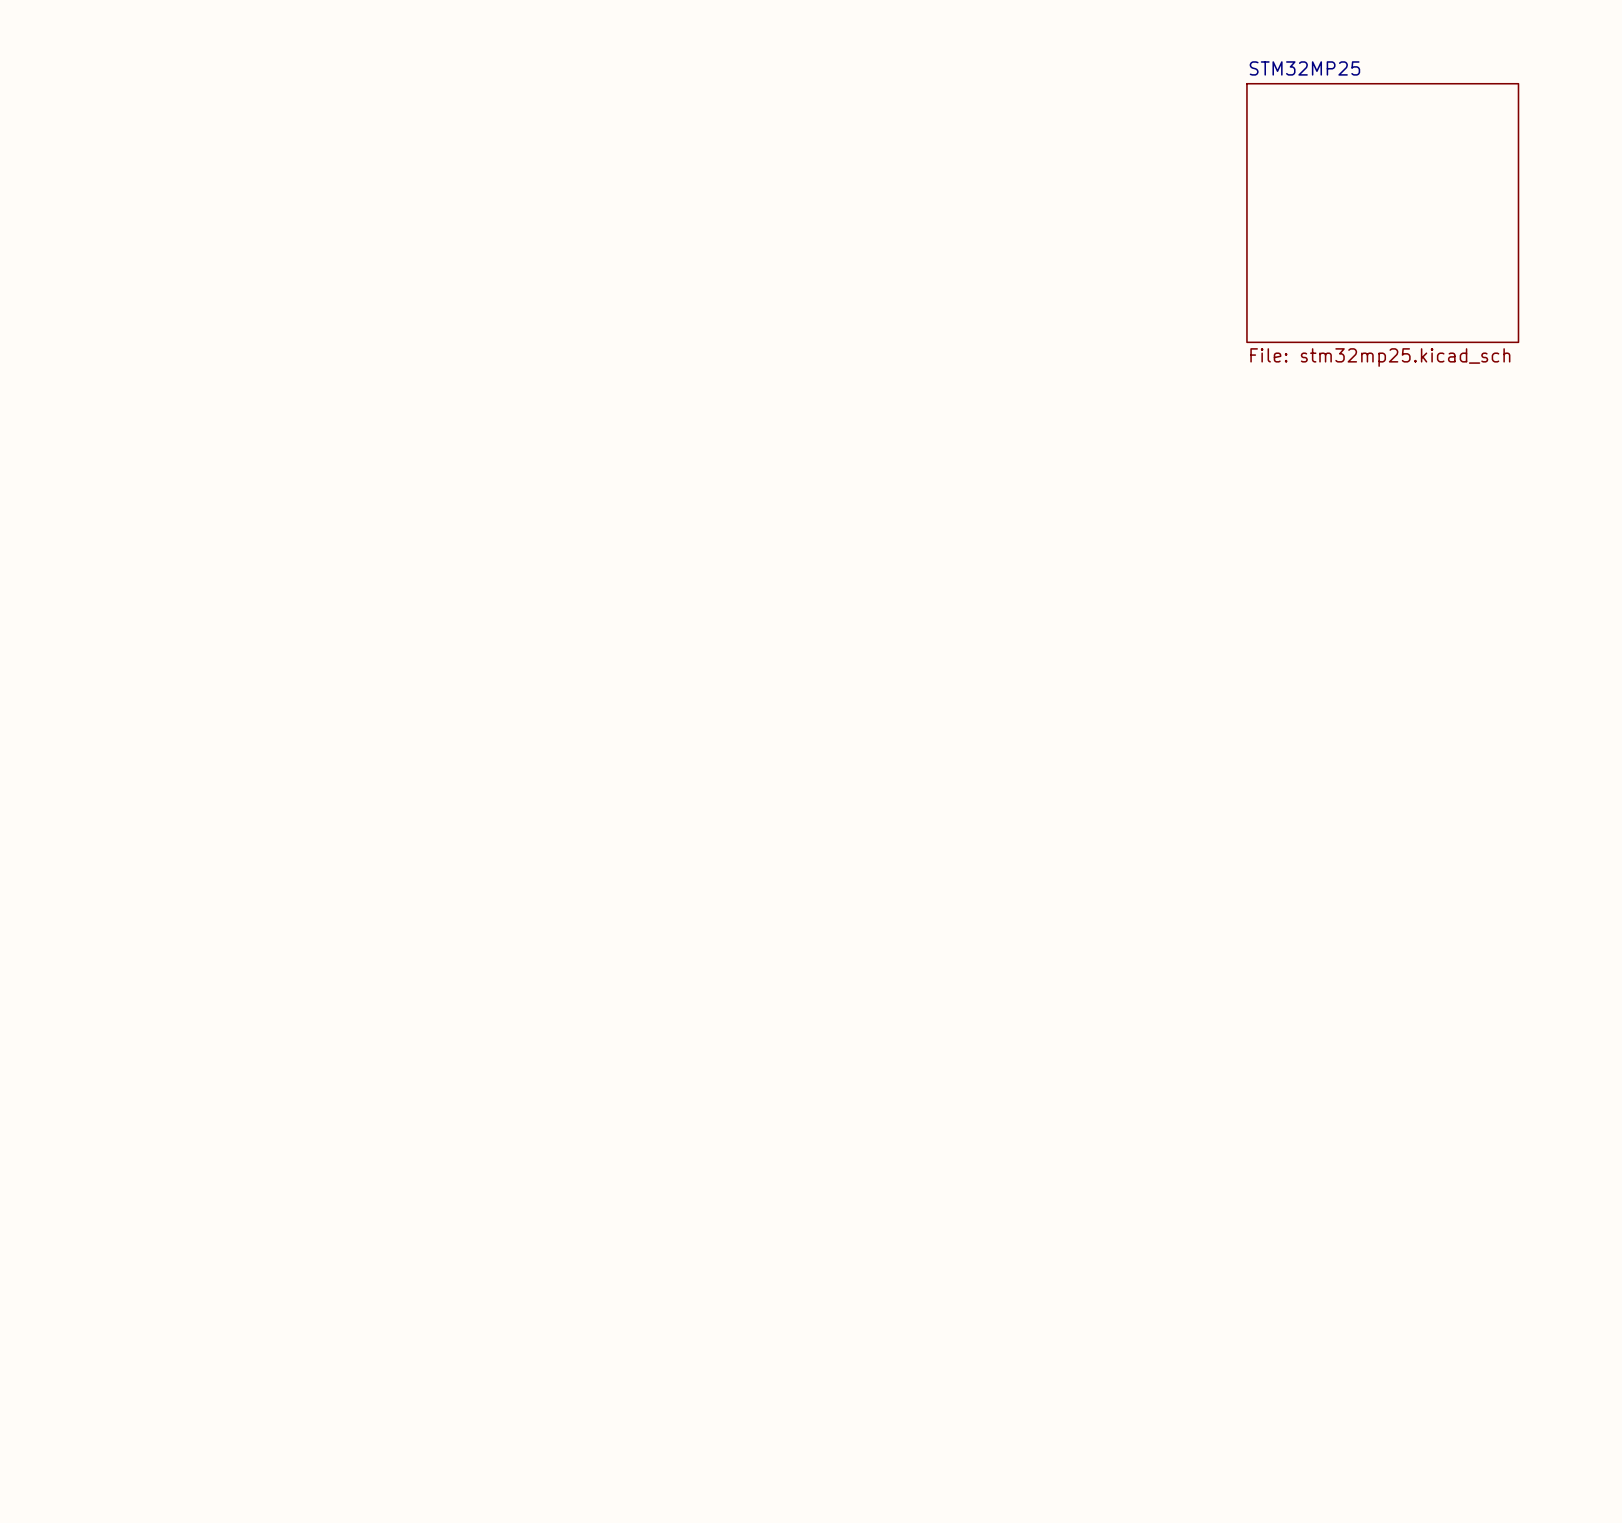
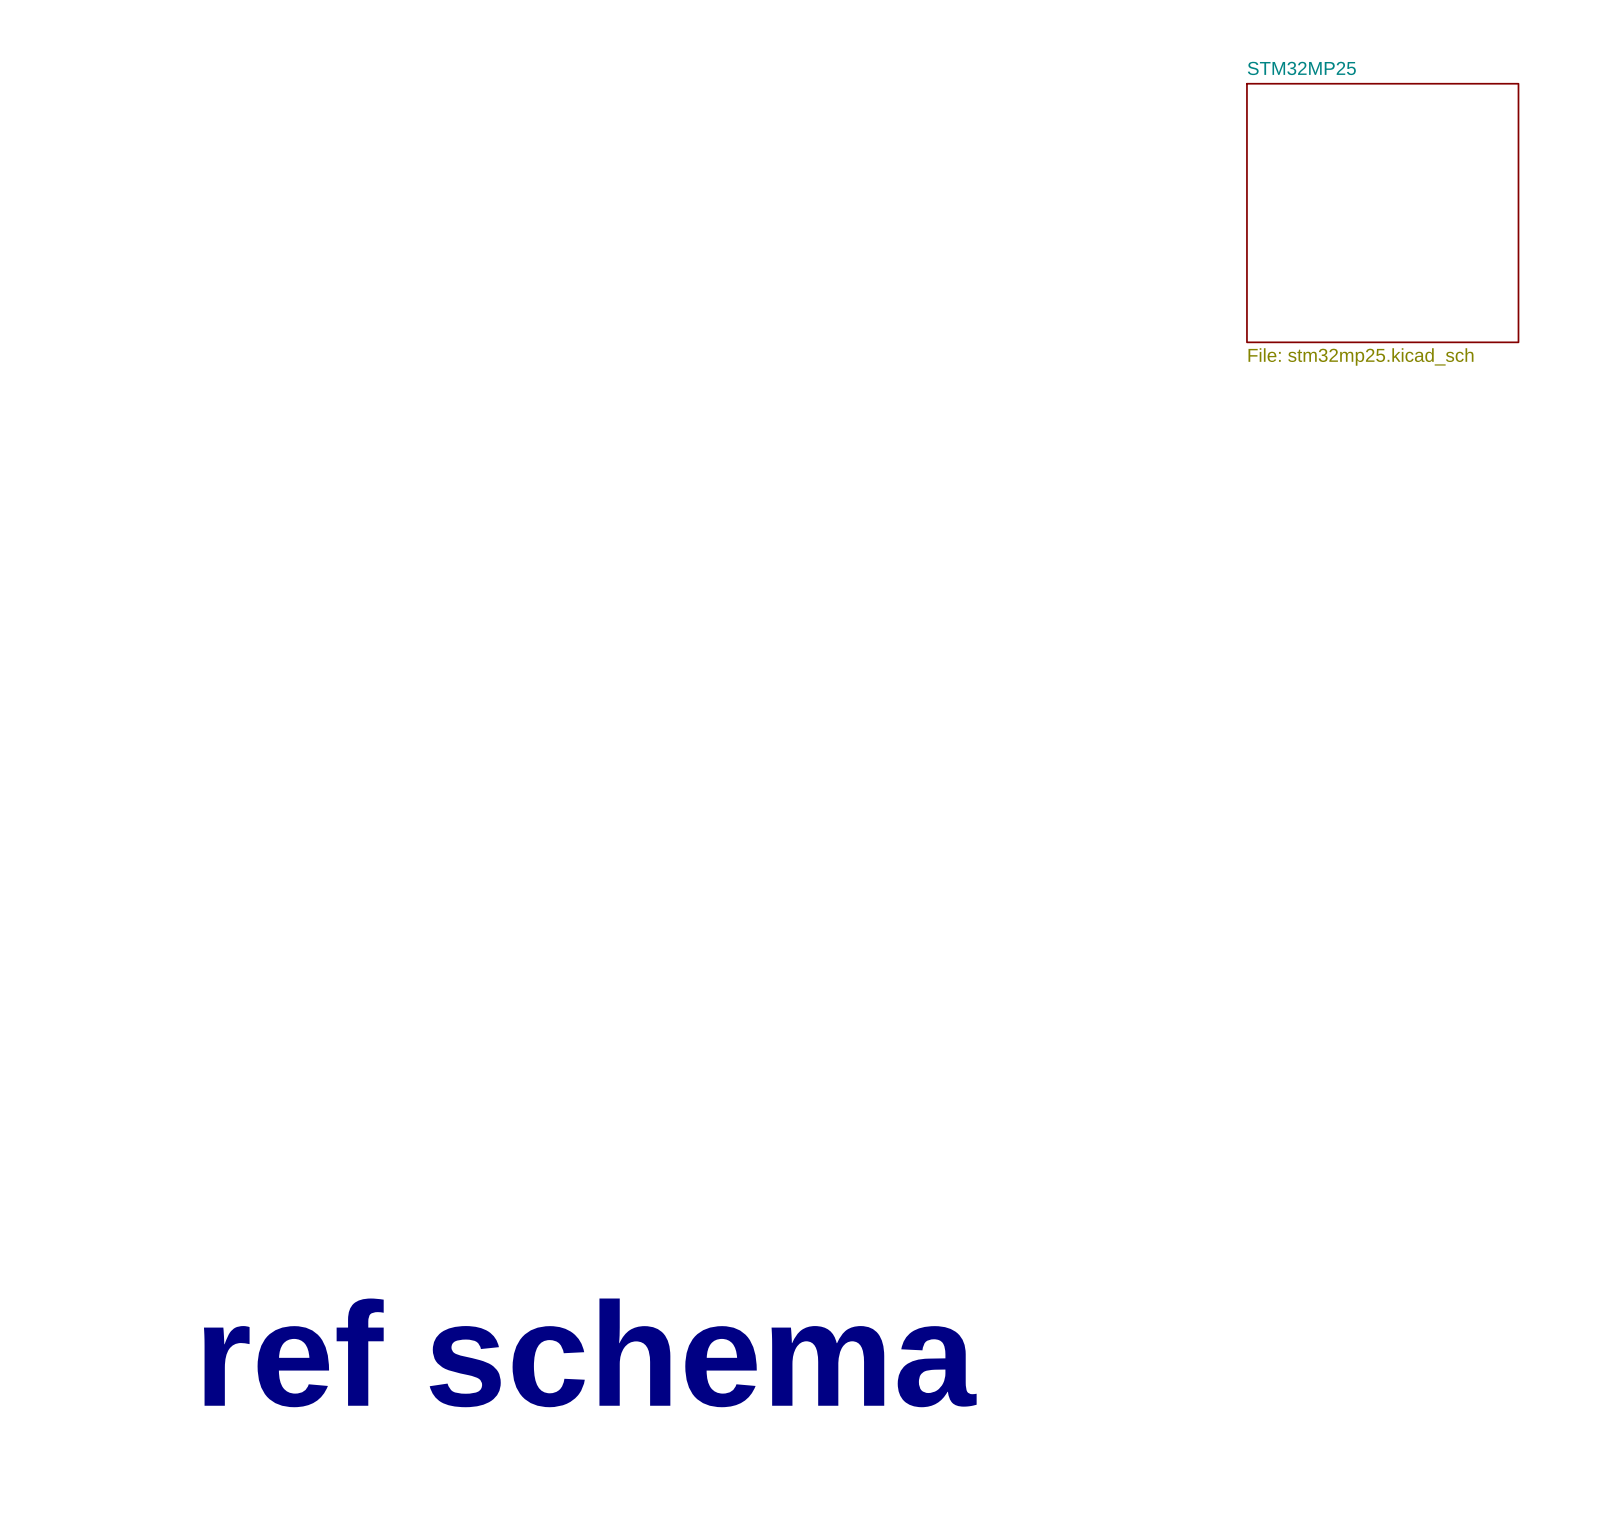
text: none -> ref schema (590, 1352)

